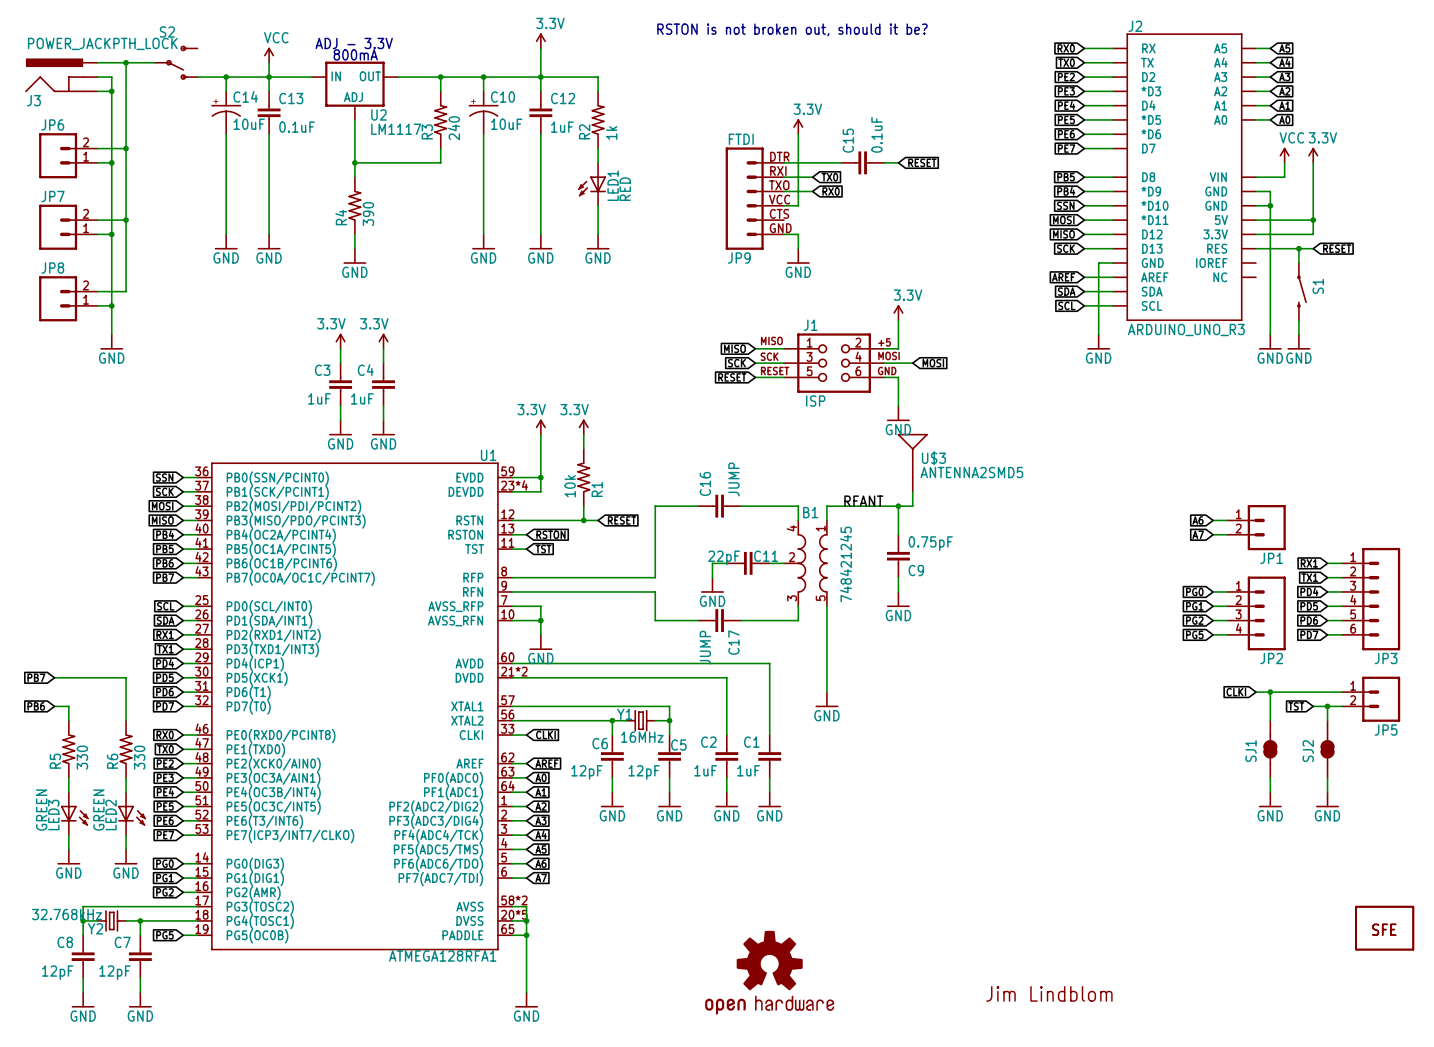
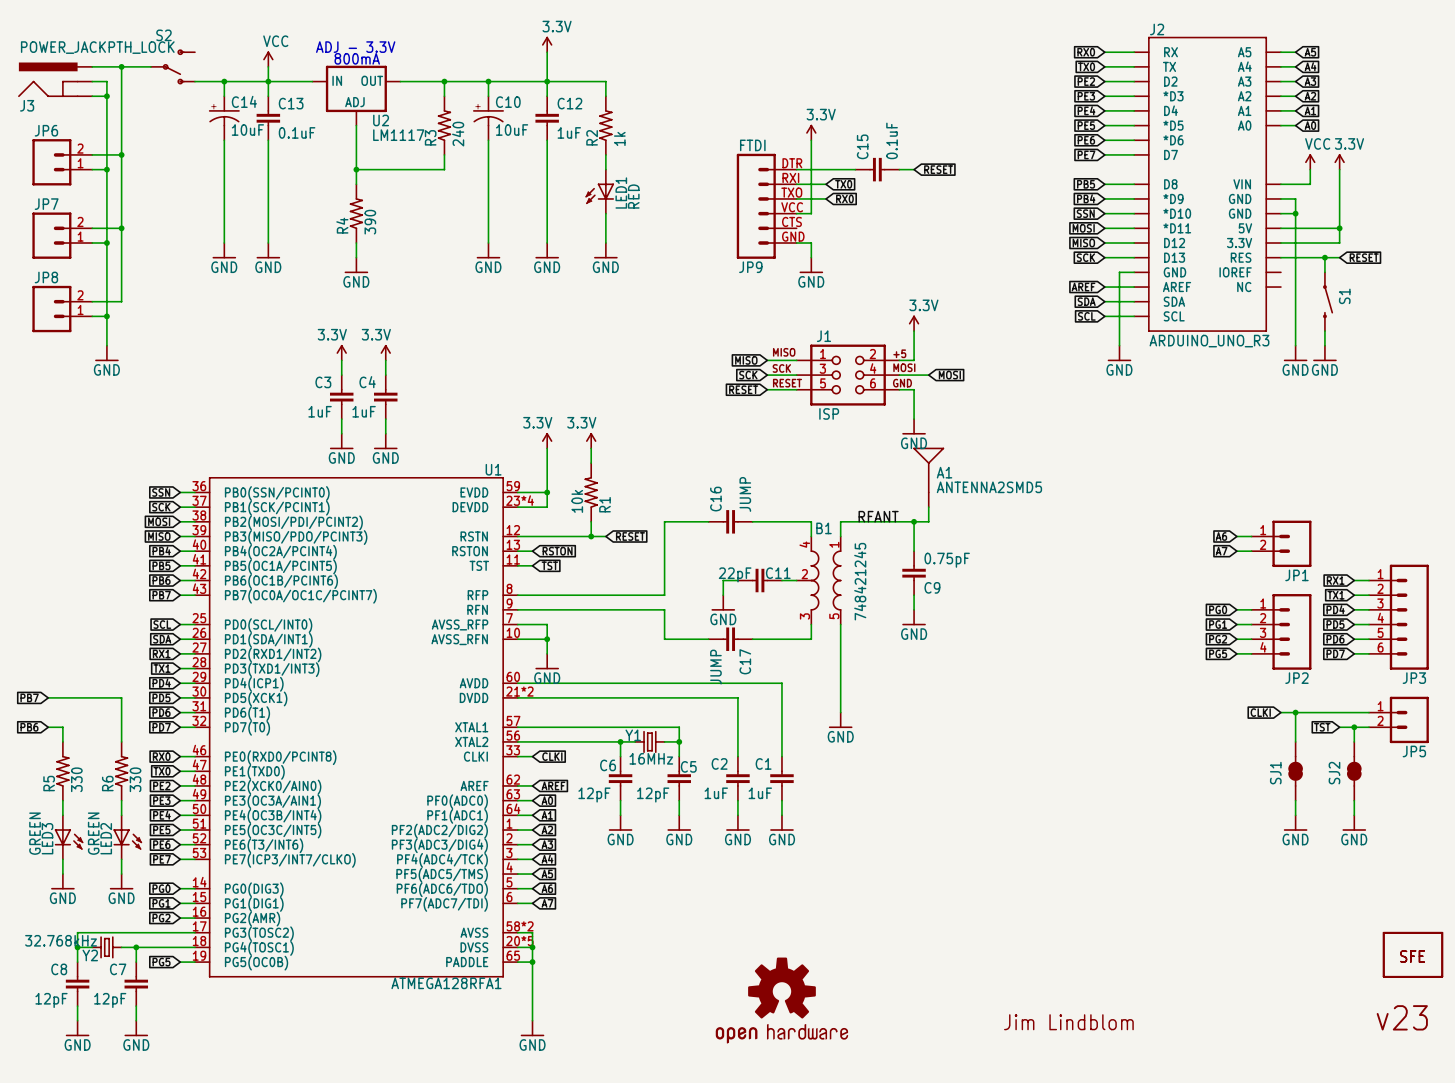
text: RSTON is not broken out, should it be? (792, 29) -> none
U$3 name: U$3 (933, 458) -> A1 (944, 472)
text: none -> v23 (1402, 1017)

